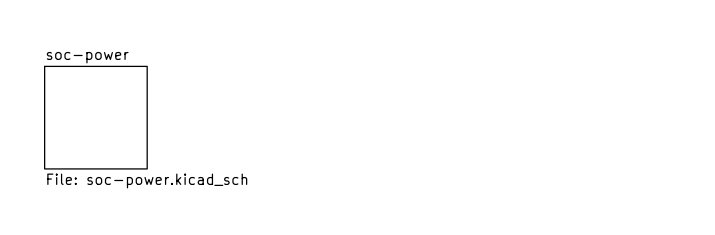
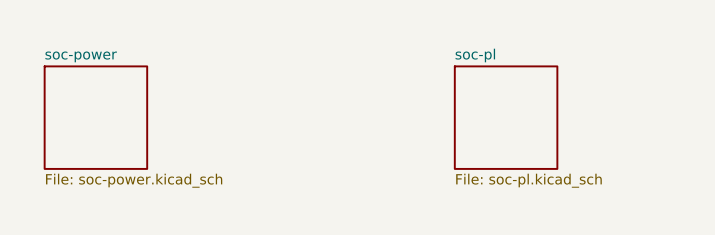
sheet soc-pl: none -> File: soc-pl.kicad_sch (506, 117)

